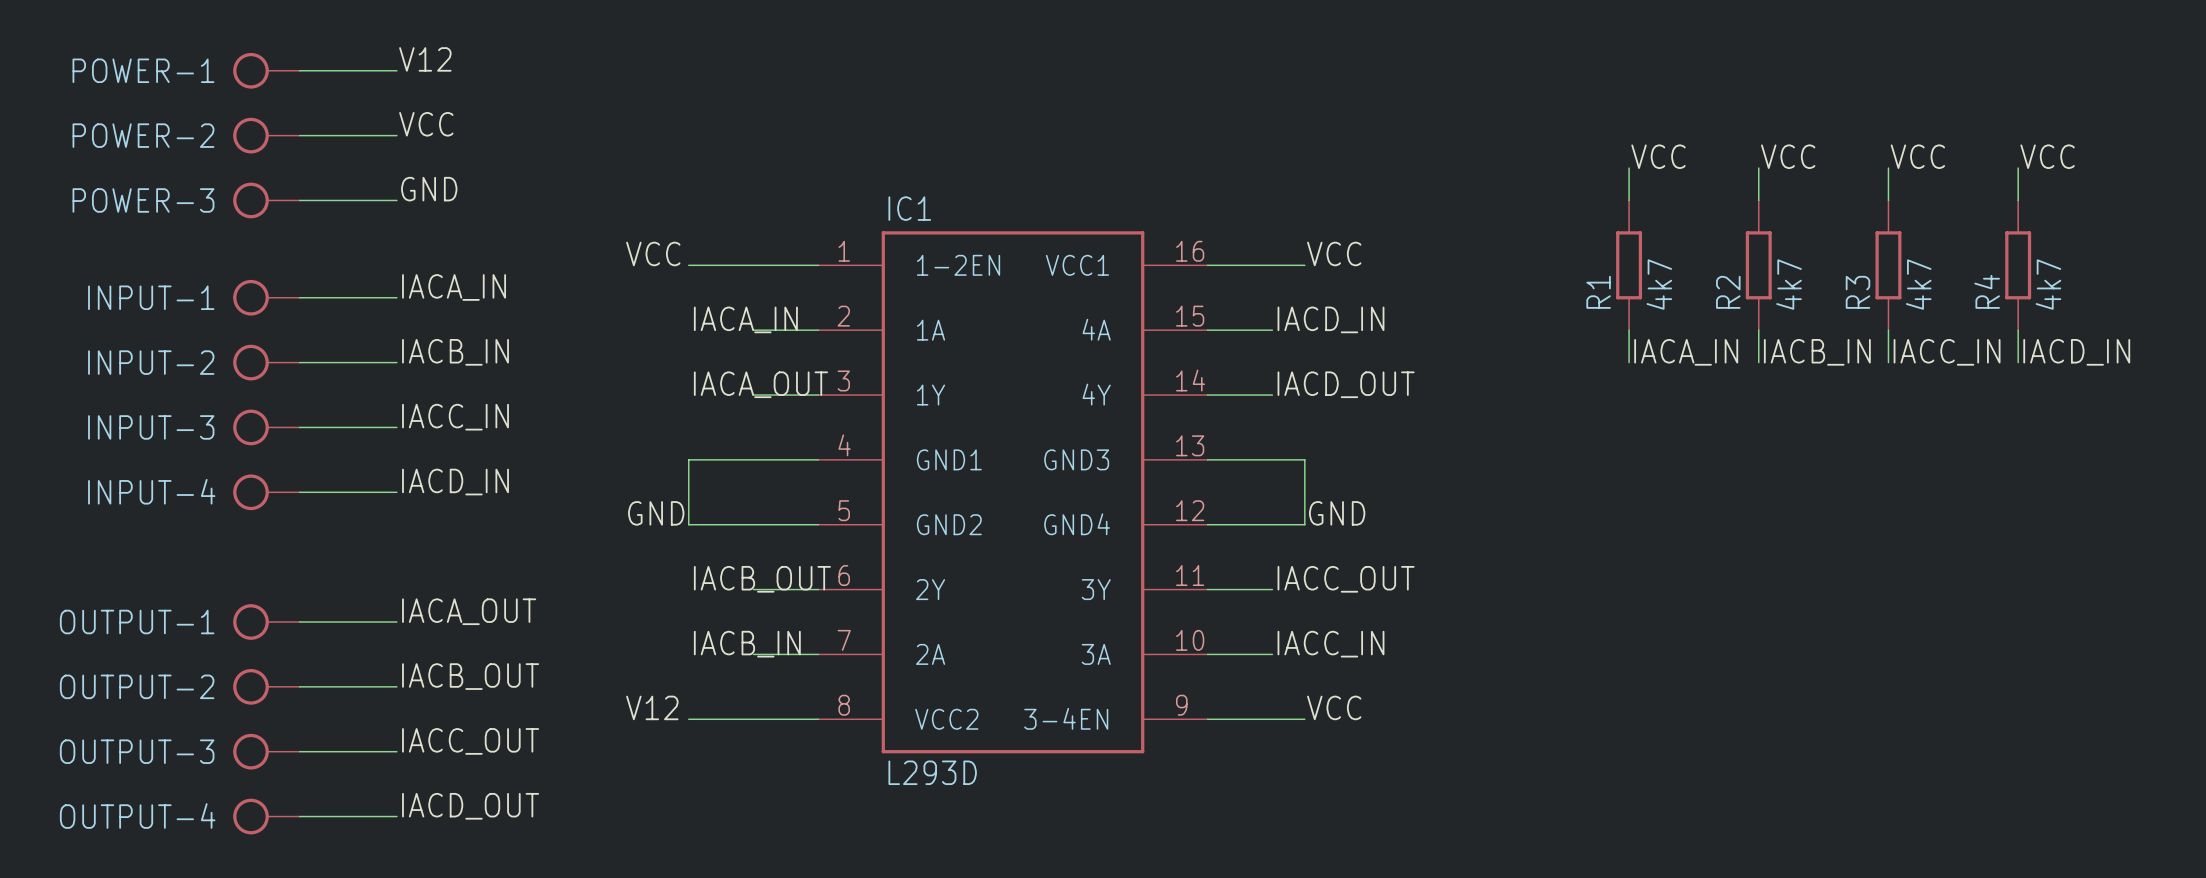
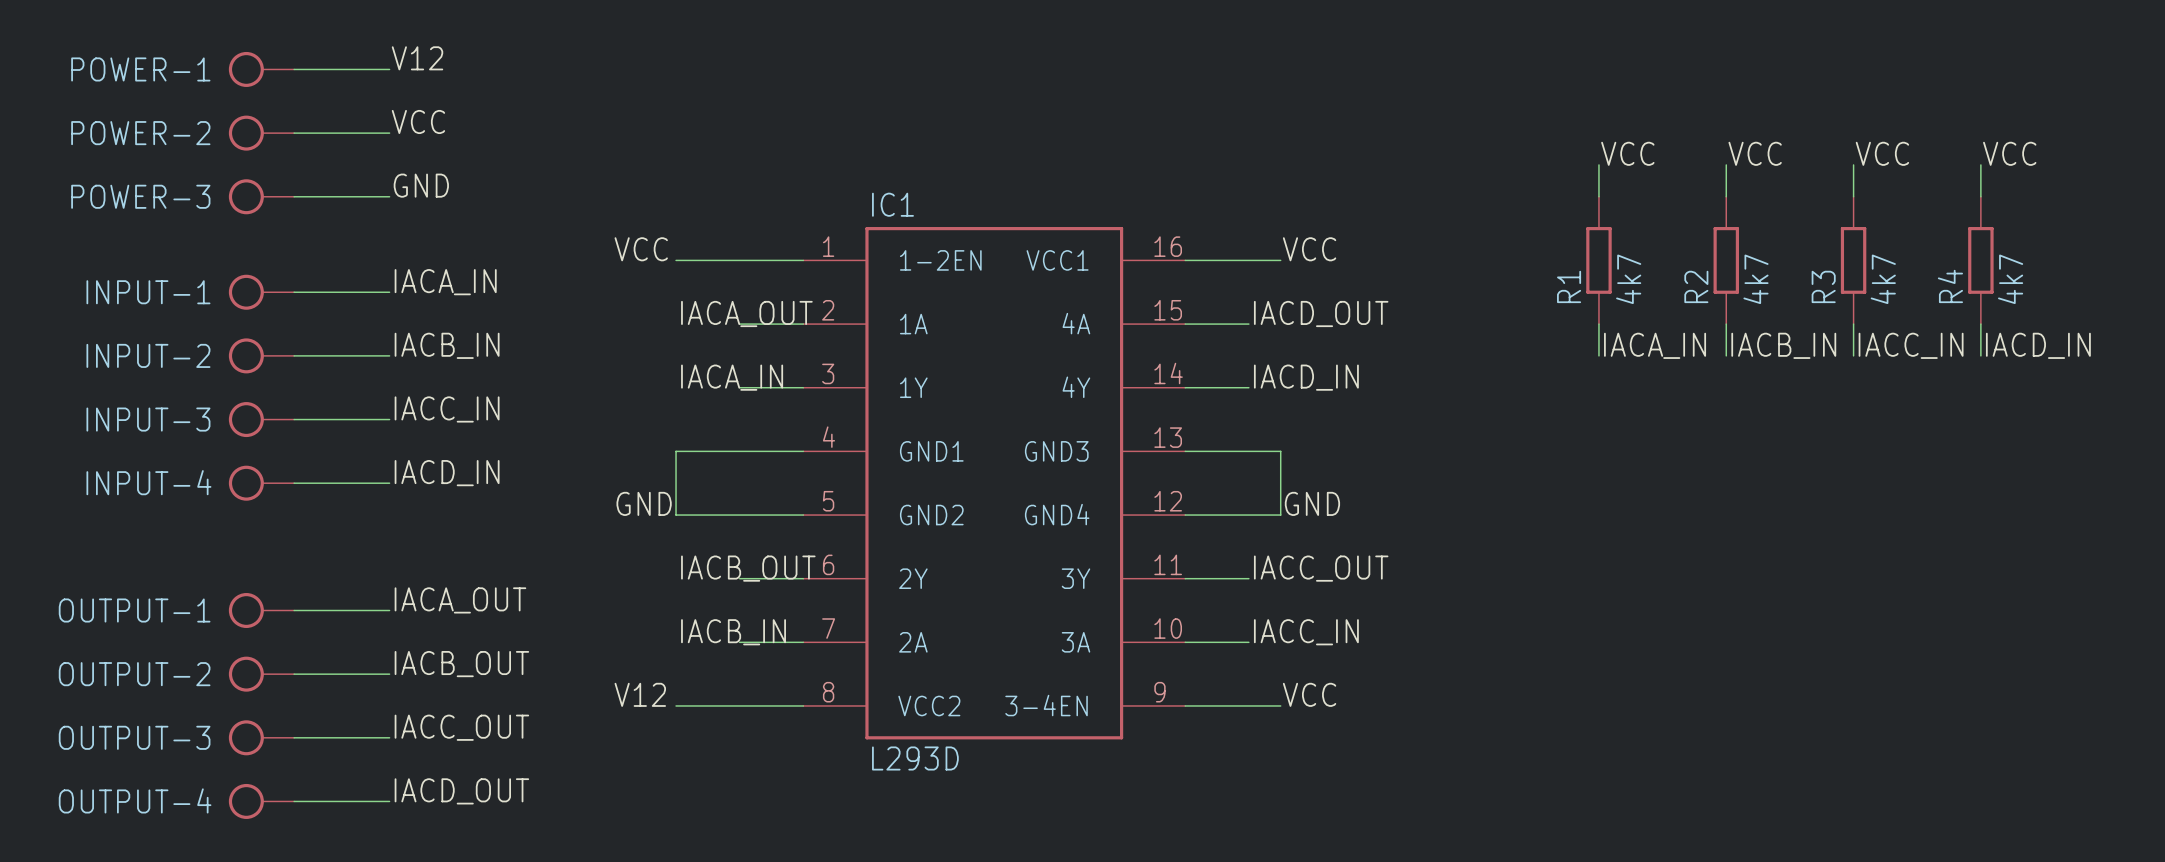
label: IACA_IN (745, 319) -> IACA_OUT (746, 313)
label: IACD_IN (1330, 319) -> IACD_OUT (1321, 313)
label: IACA_OUT (760, 384) -> IACA_IN (732, 377)
label: IACD_OUT (1346, 384) -> IACD_IN (1306, 377)

